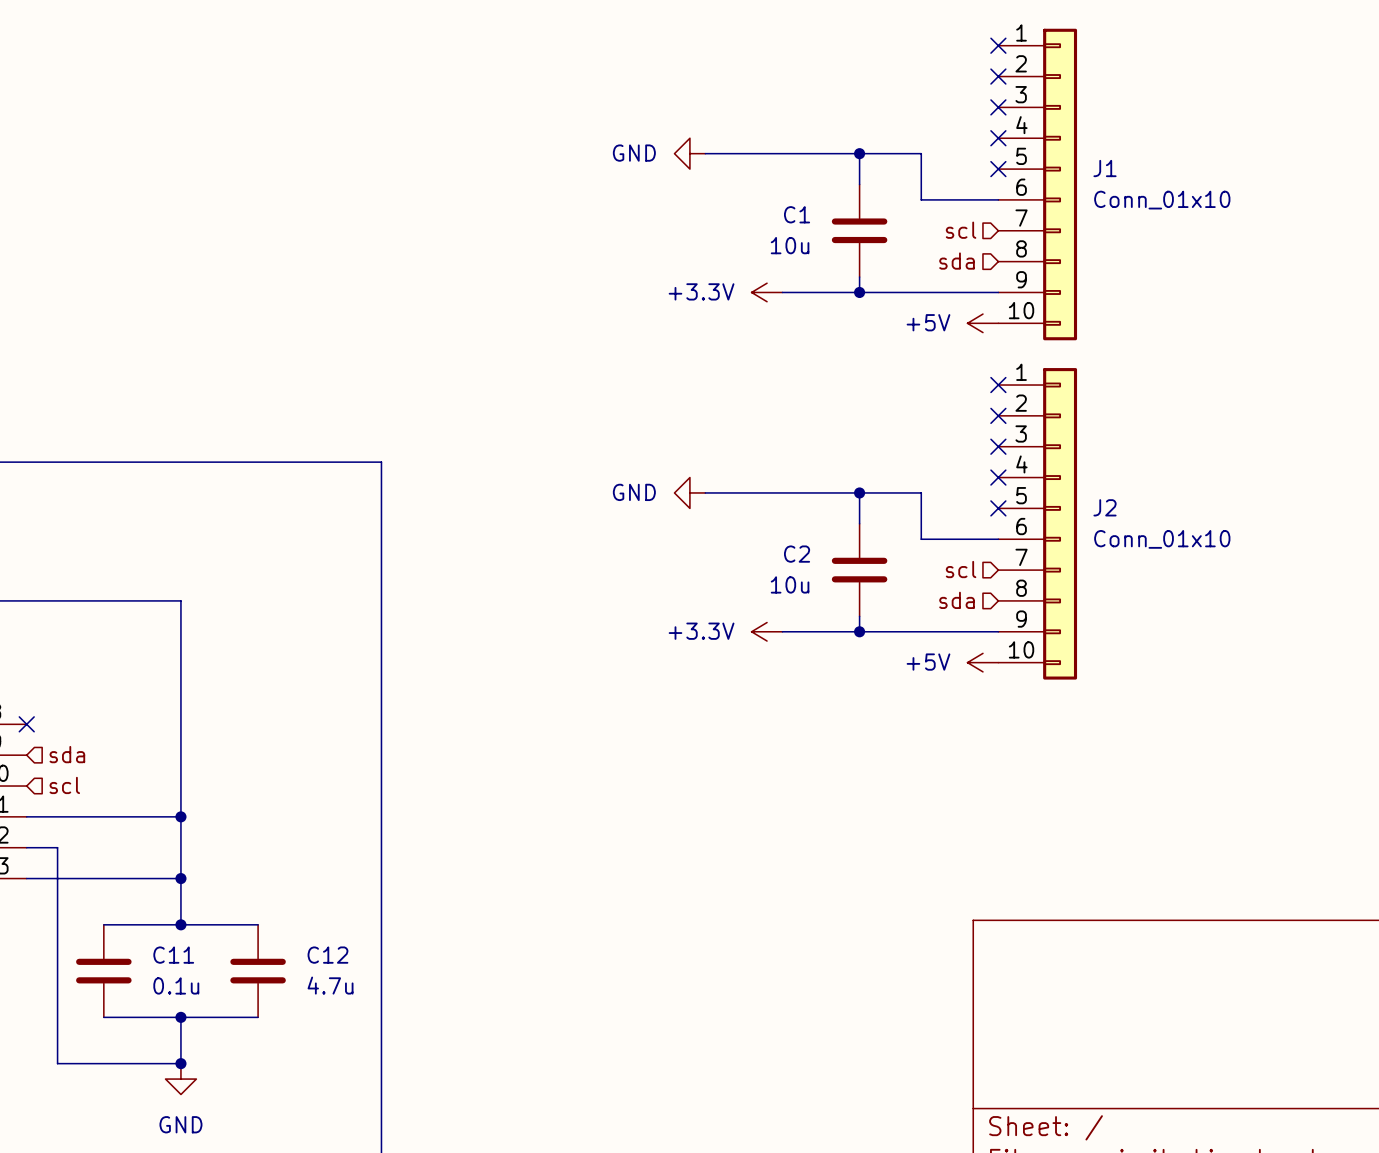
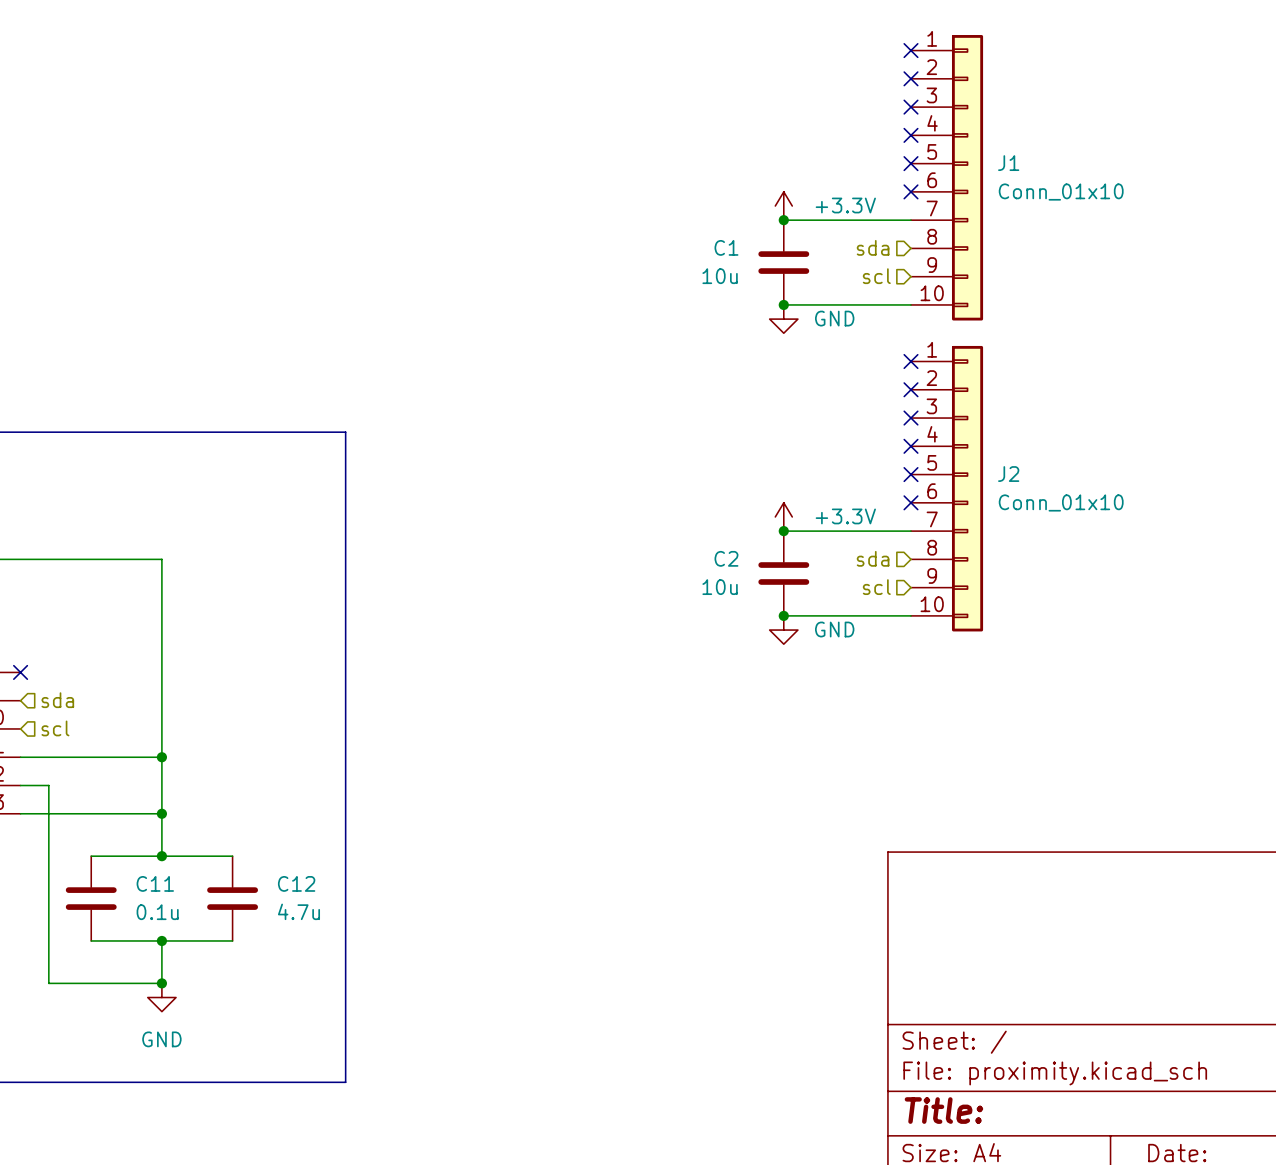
power symbol: GND (689, 153) -> none
wire: (705, 153) (921, 153) (921, 199) (998, 199) -> none
wire: (859, 153) (859, 184) -> none
junction: (859, 153) -> none
no-connect mark: none -> (910, 191)
wire: none -> (783, 220) (910, 220)
junction: none -> (783, 220)
C1 position: (859, 230) -> (783, 262)
hierarchical label position: scl (961, 230) -> scl (876, 276)
power symbol text position: +3.3V (701, 291) -> +3.3V (845, 205)
power symbol rotation: 0° (767, 292) -> 90° clockwise (783, 206)
power symbol position: +3.3V (767, 292) -> +3.3V (783, 206)
wire: (782, 292) (998, 292) -> none
junction: (859, 292) -> none
wire: none -> (783, 304) (910, 304)
junction: none -> (783, 304)
power symbol: +5V (982, 323) -> none
power symbol: none -> GND (783, 319)
power symbol: GND (689, 492) -> none
wire: (705, 492) (921, 492) (921, 539) (998, 539) -> none
wire: (859, 492) (859, 523) -> none
junction: (859, 492) -> none
no-connect mark: none -> (910, 502)
hierarchical label position: scl (961, 569) -> scl (876, 587)
wire: none -> (783, 531) (910, 531)
junction: none -> (783, 531)
C2 position: (859, 570) -> (783, 573)
power symbol text position: +3.3V (701, 631) -> +3.3V (845, 516)
power symbol rotation: 0° (767, 631) -> 90° clockwise (783, 516)
power symbol position: +3.3V (767, 631) -> +3.3V (783, 516)
wire: (782, 631) (998, 631) -> none
junction: (859, 631) -> none
wire: none -> (783, 615) (910, 615)
junction: none -> (783, 615)
power symbol: +5V (982, 662) -> none
power symbol: none -> GND (783, 630)

